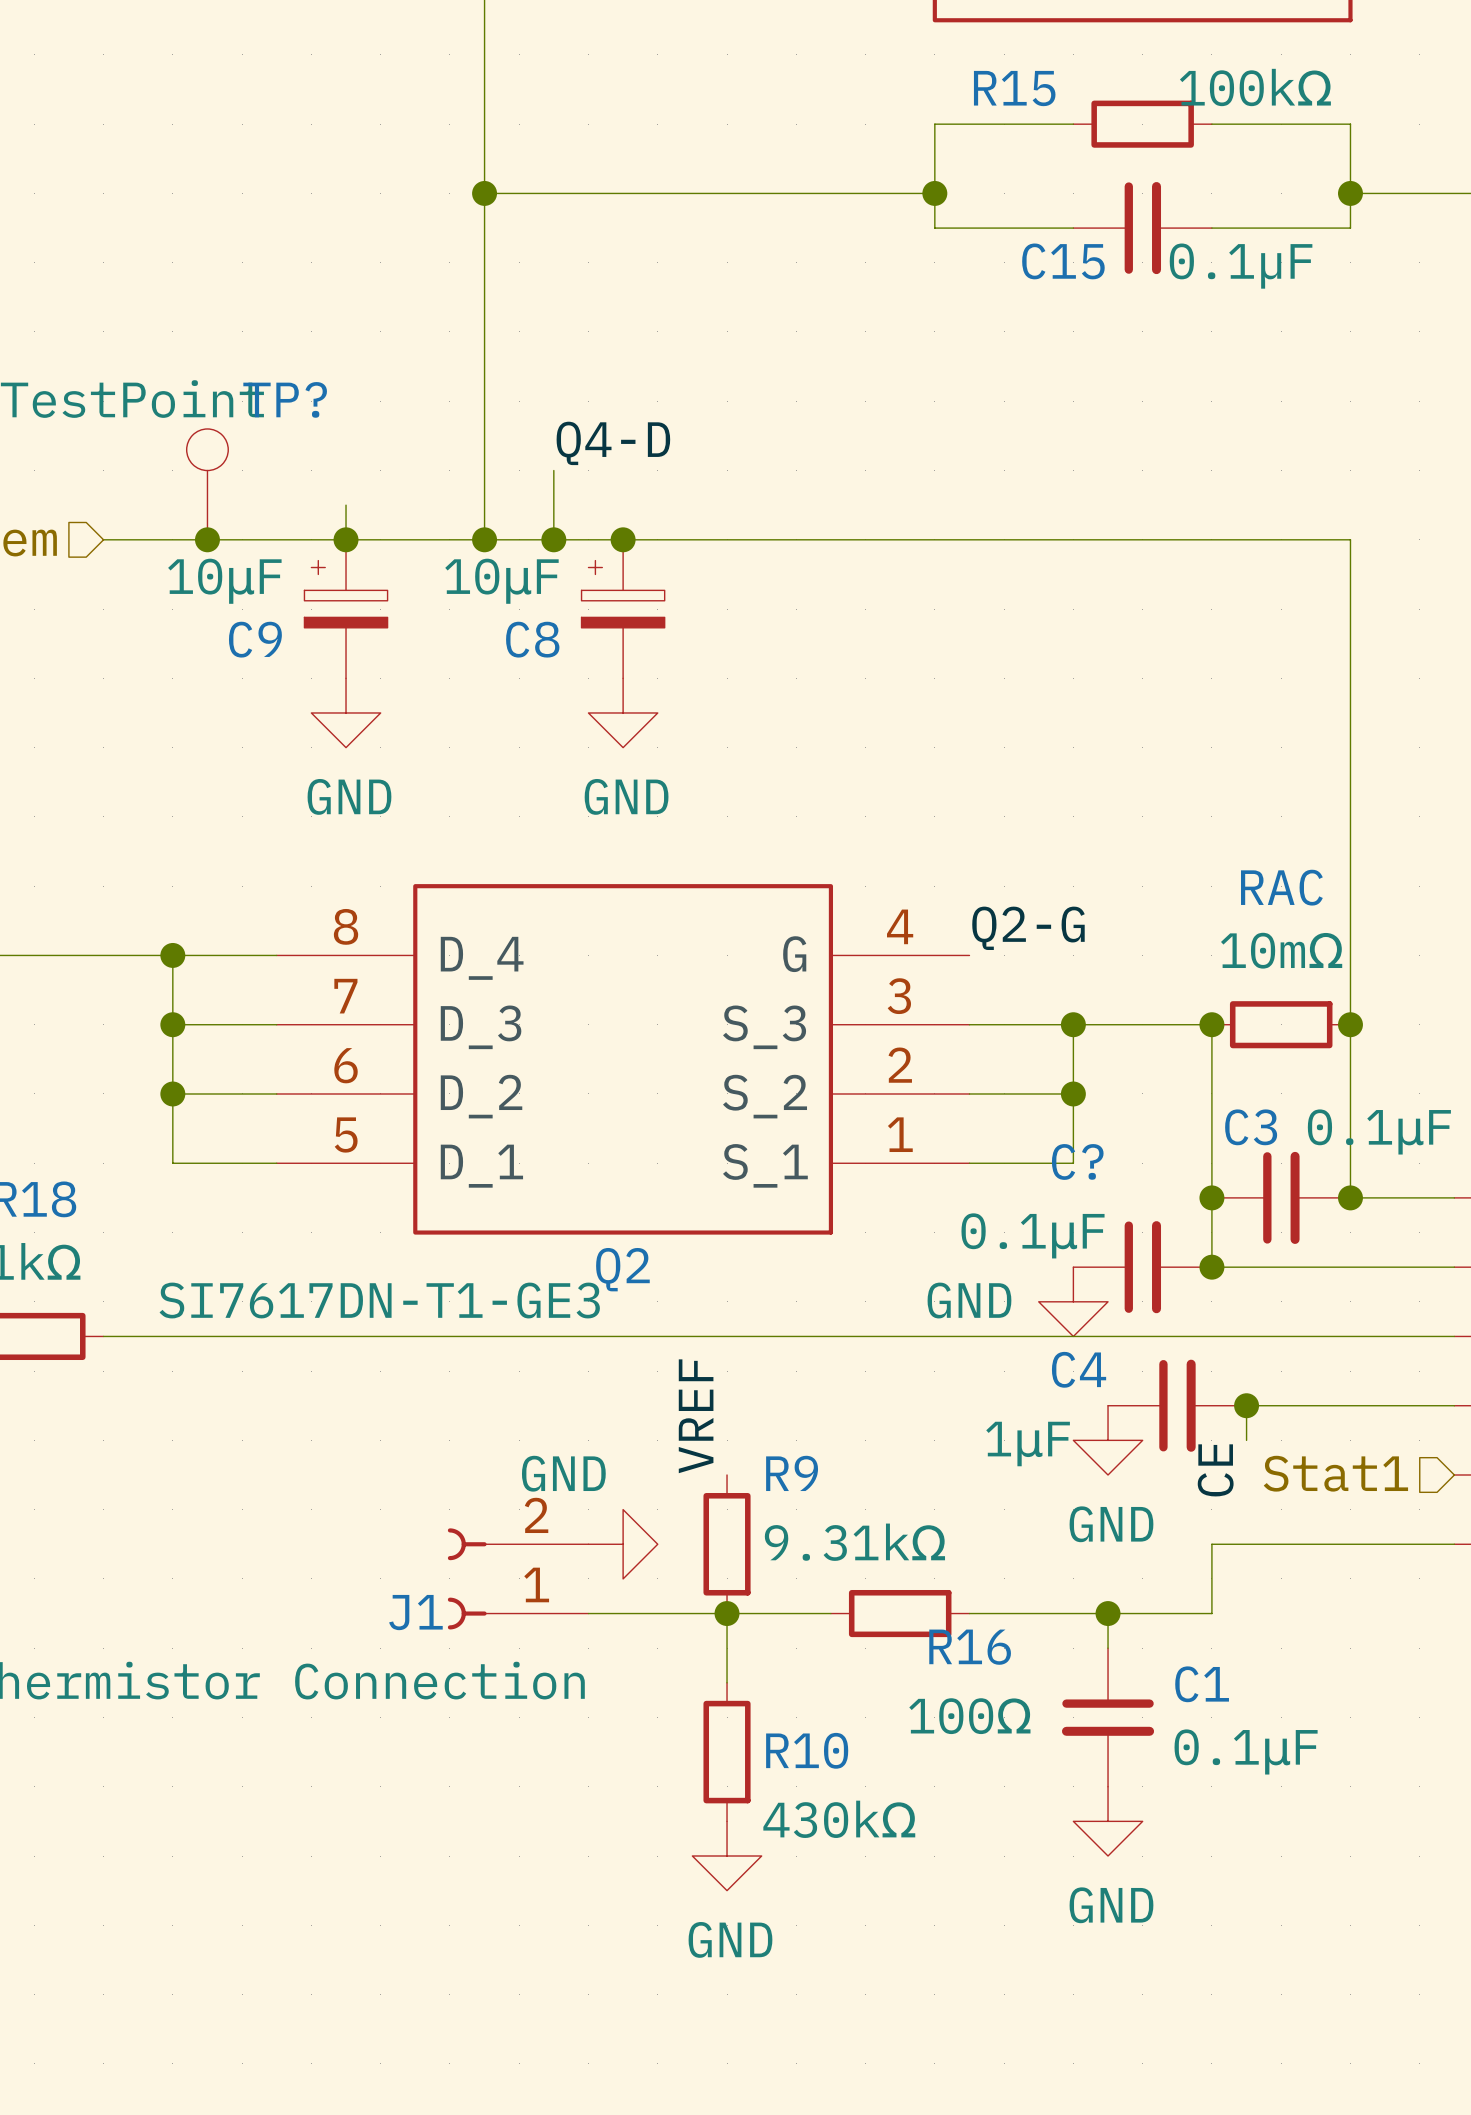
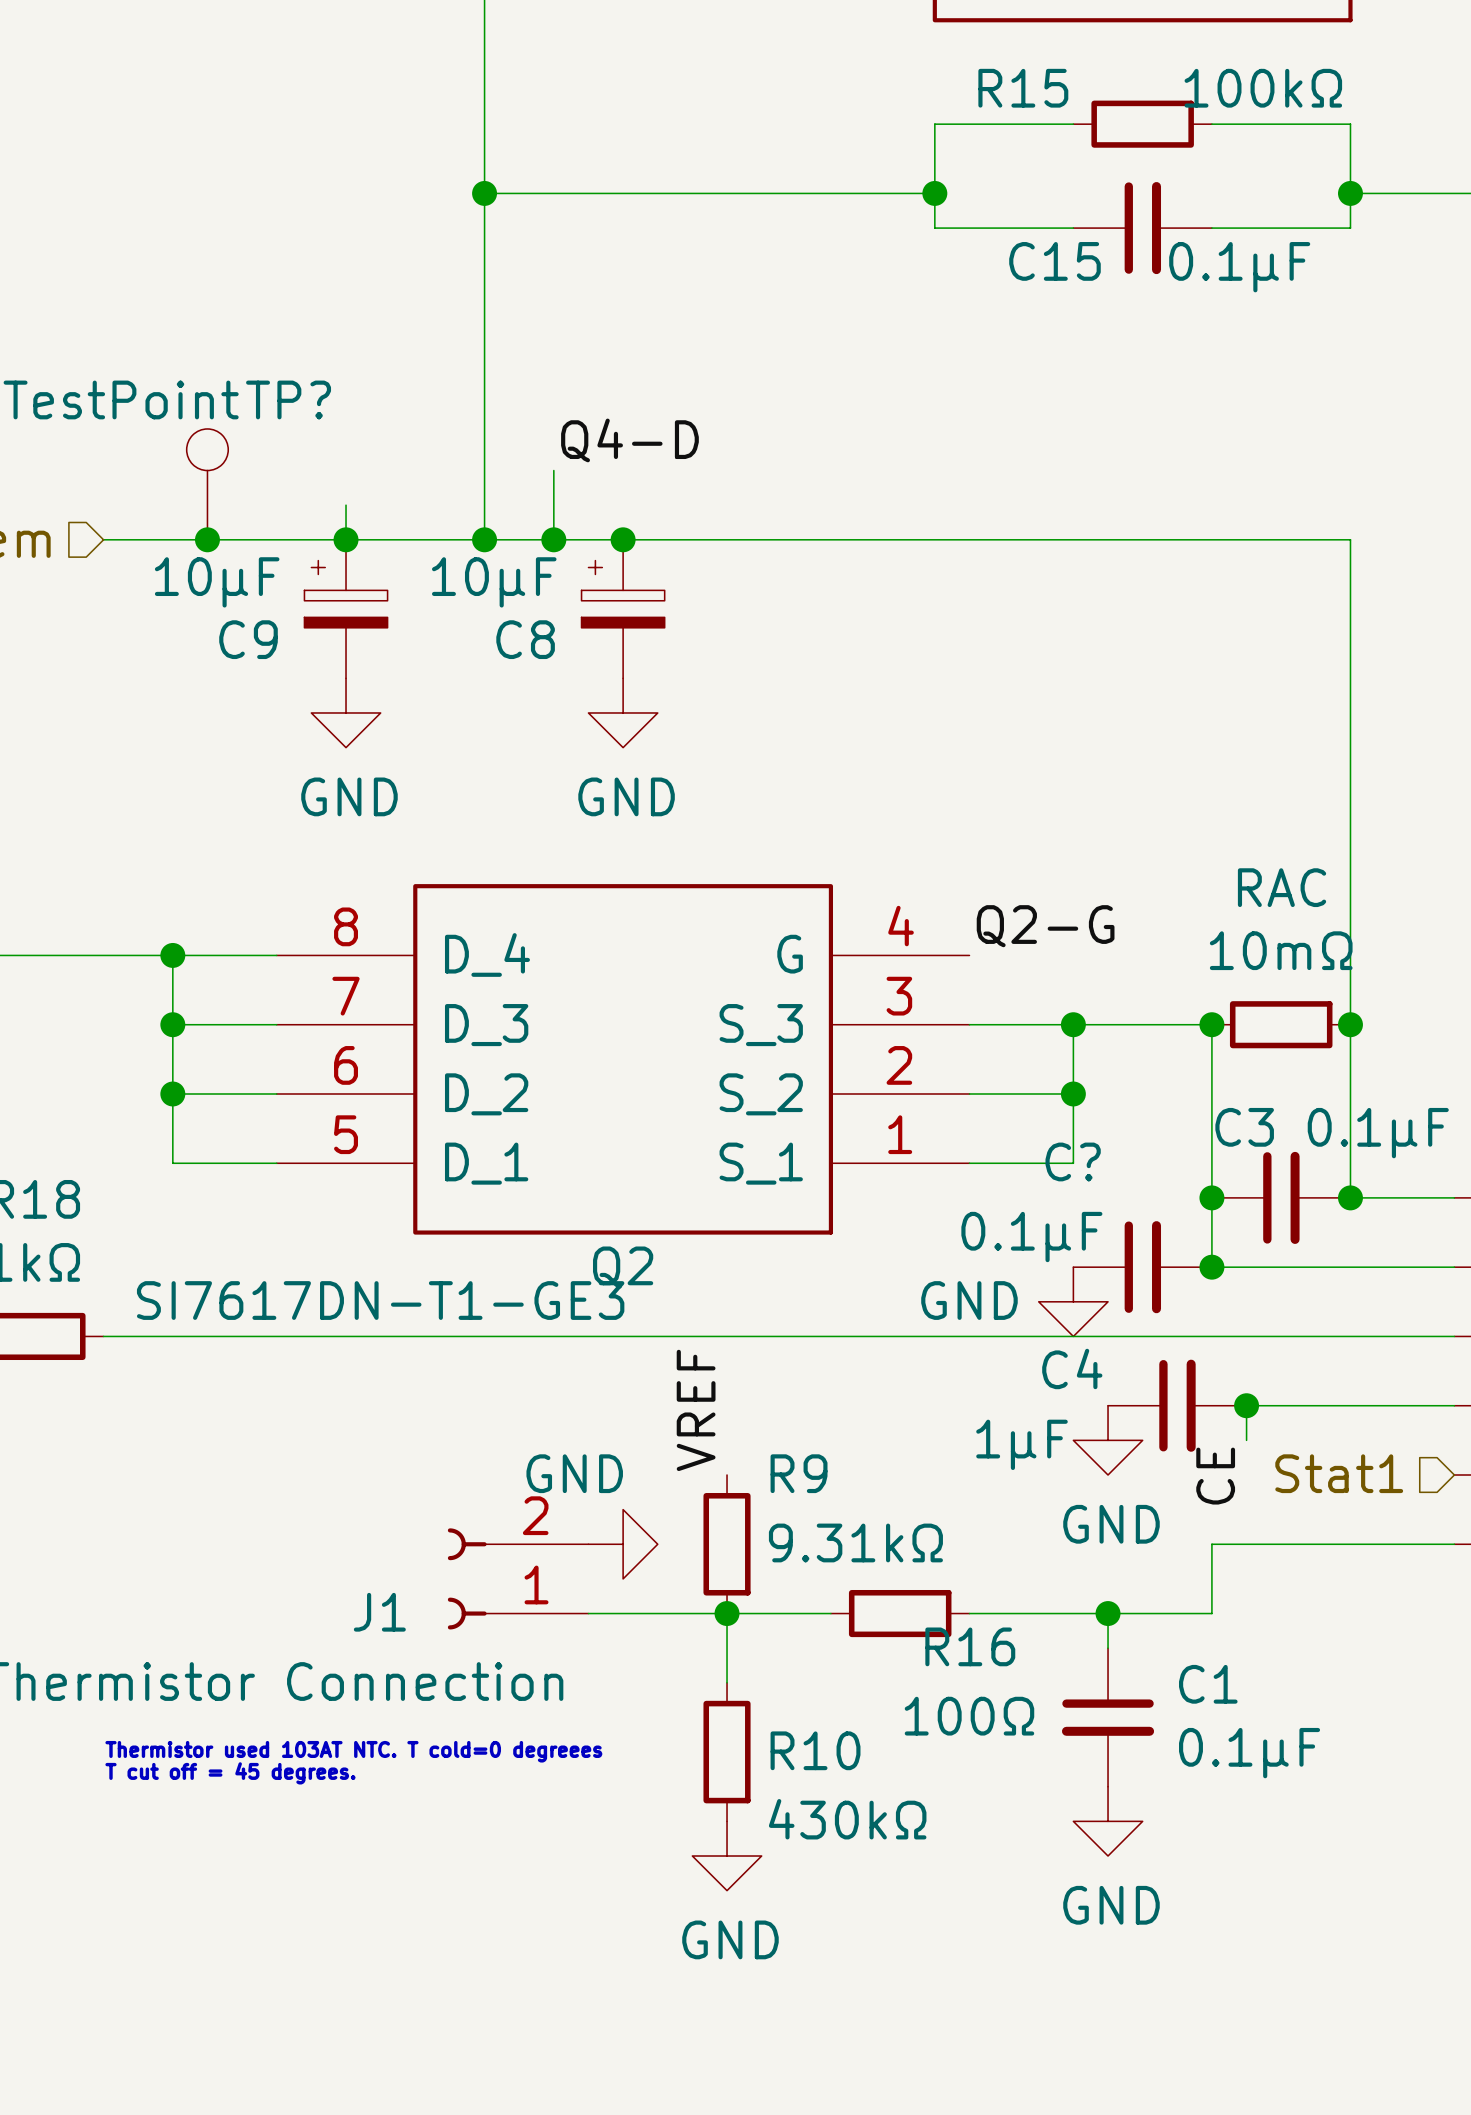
J1 name position: J1 (415, 1612) -> J1 (379, 1612)
text: none -> Thermistor used 103AT NTC. T cold=0 degreees (353, 1751)
text: none -> T cut off = 45 degrees. (230, 1773)

